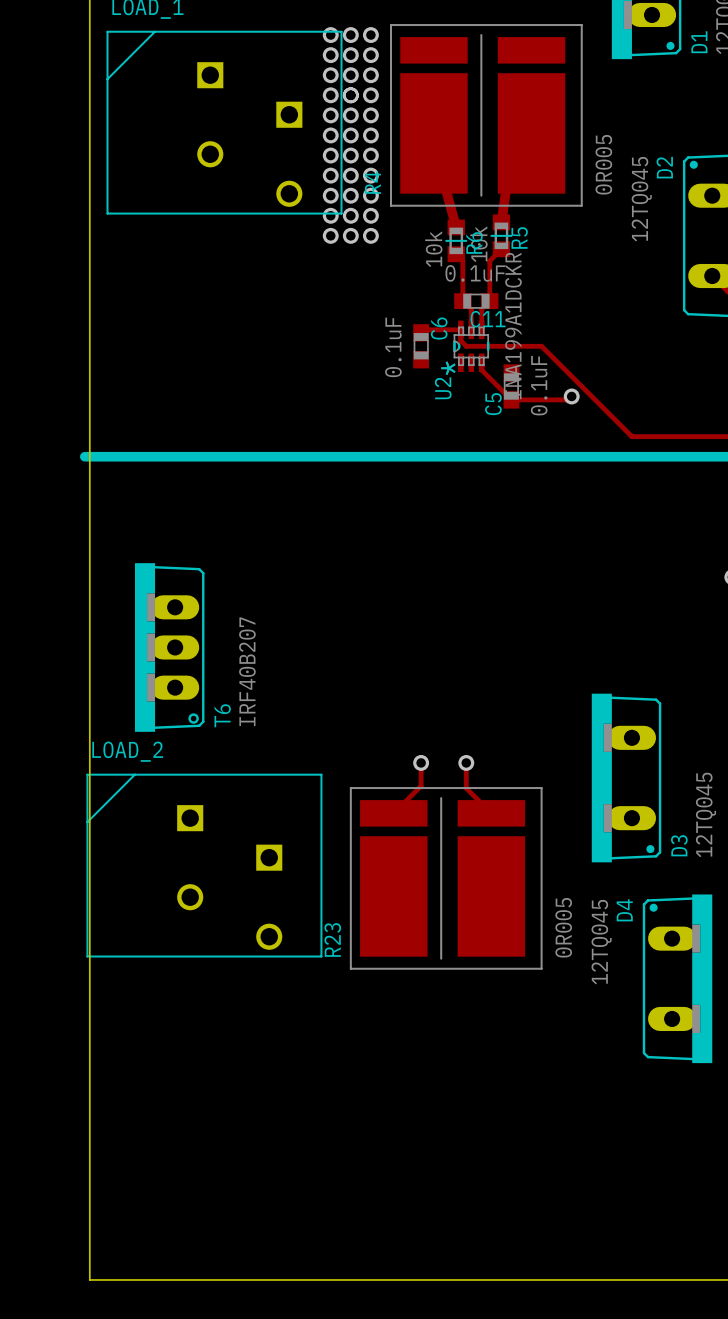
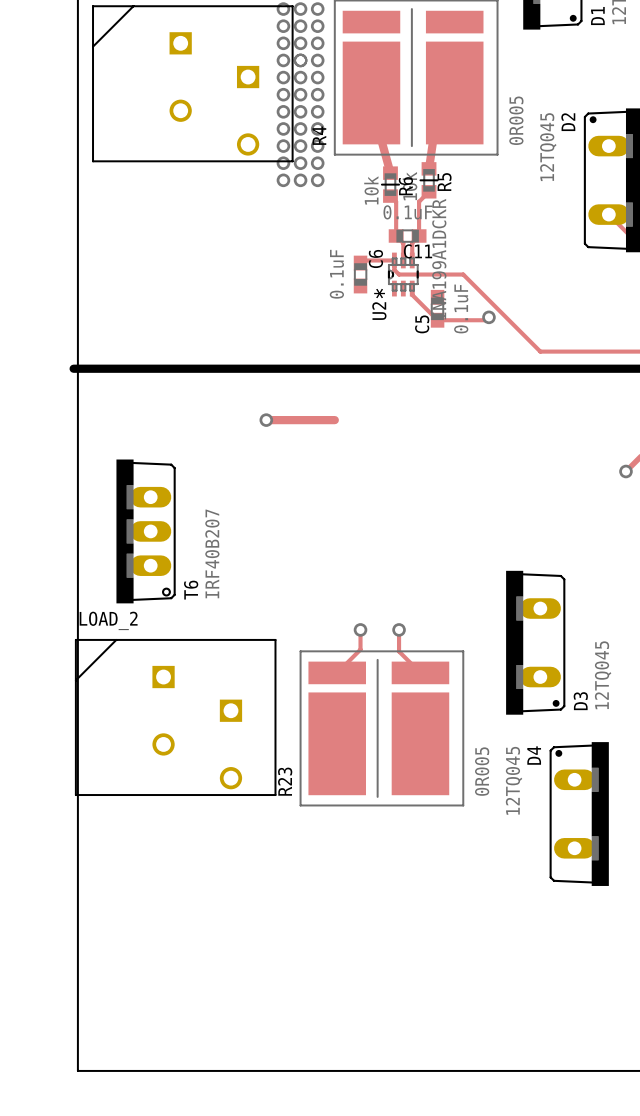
track: none -> (266, 420) (334, 420)
via: none -> (266, 420)

